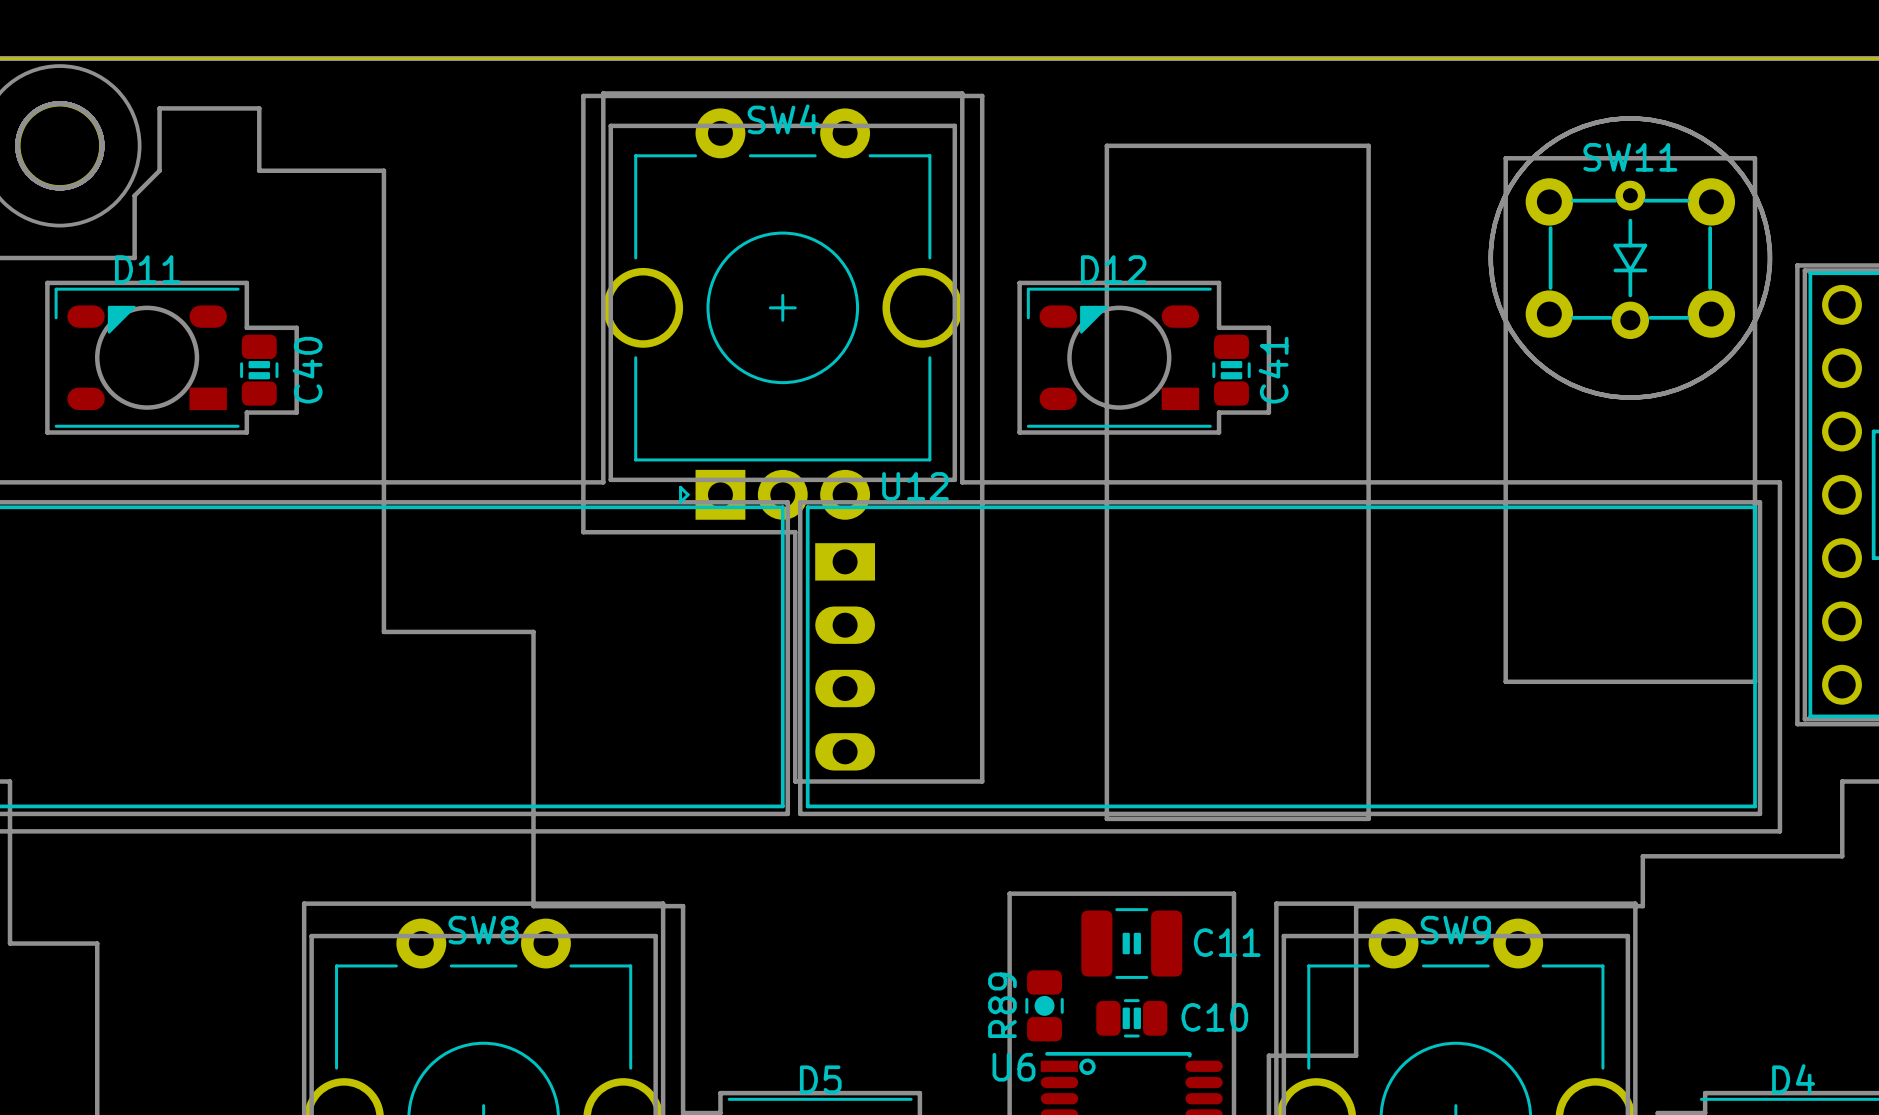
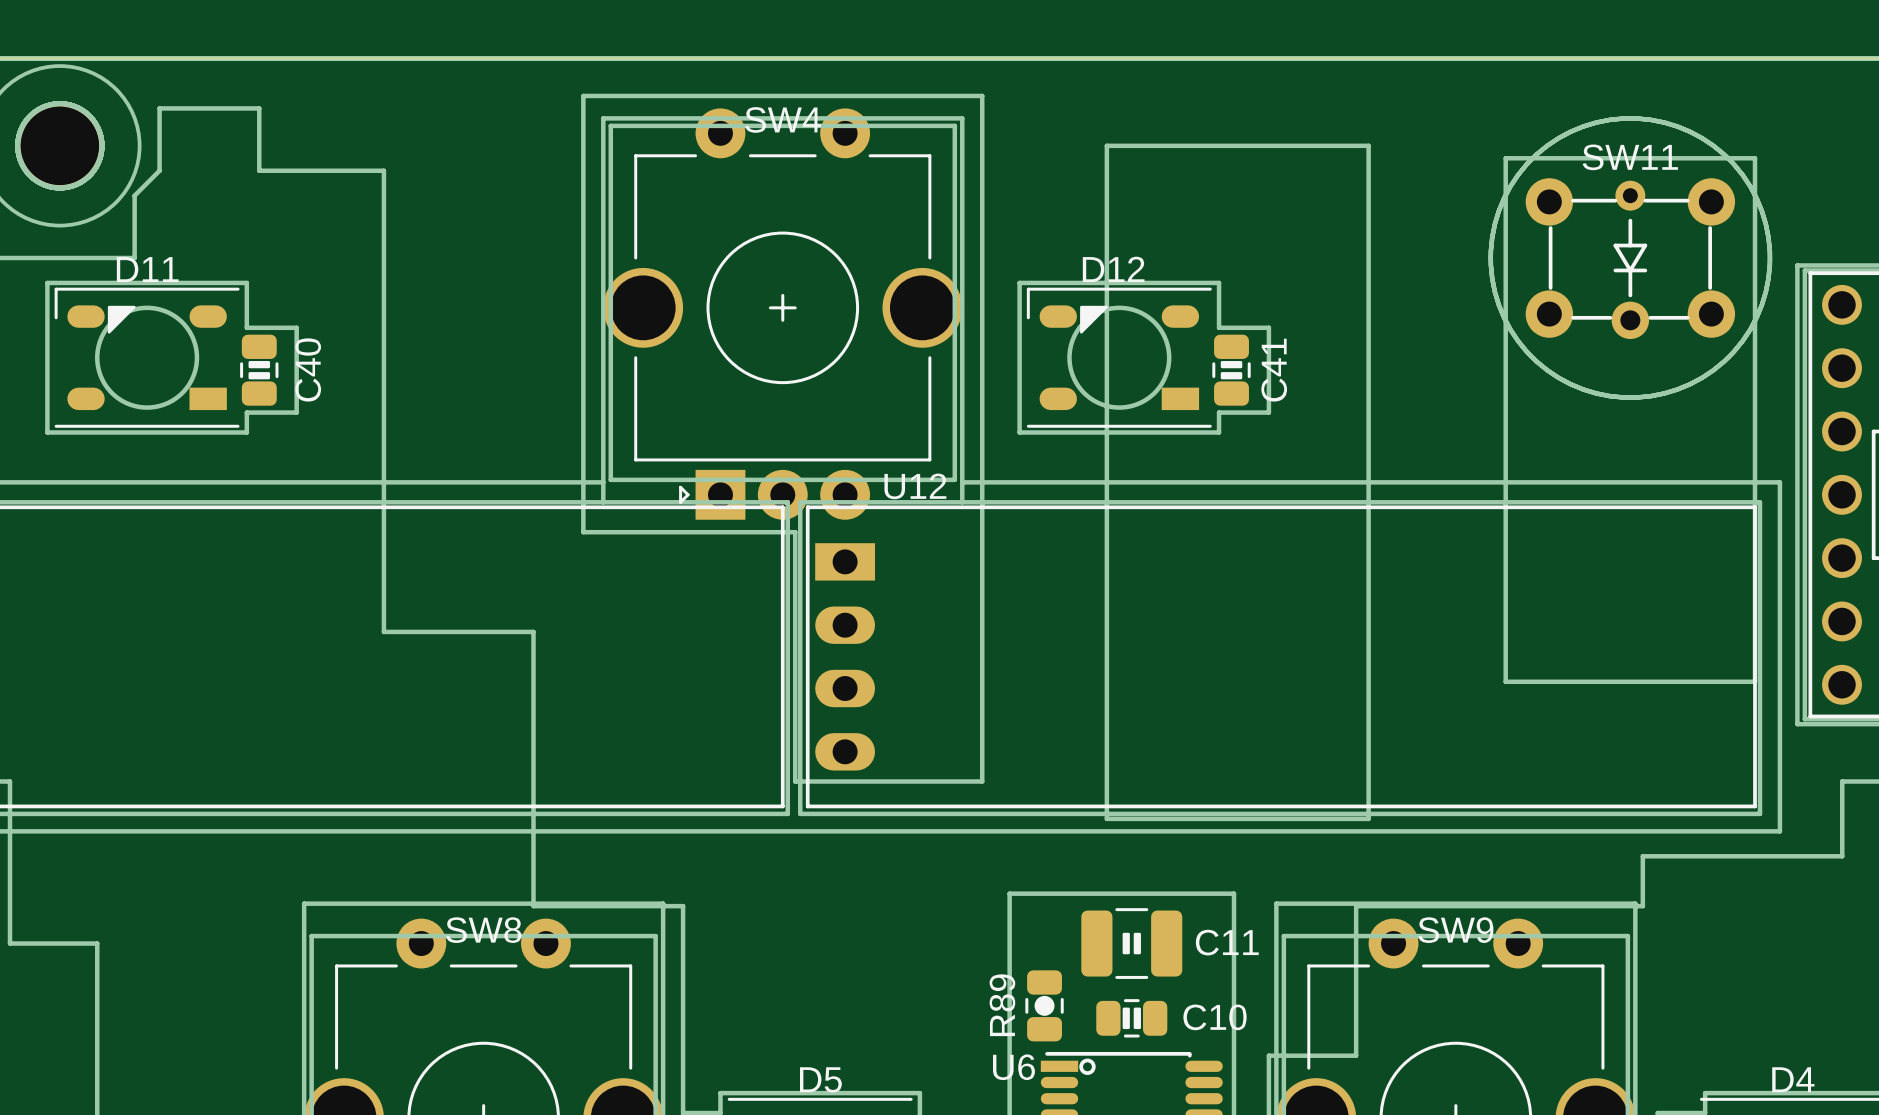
line: (603, 118) (603, 93) (962, 93) (962, 118) -> (603, 118) (962, 118)
line: none -> (603, 482) (603, 502)
line: none -> (962, 482) (962, 502)

